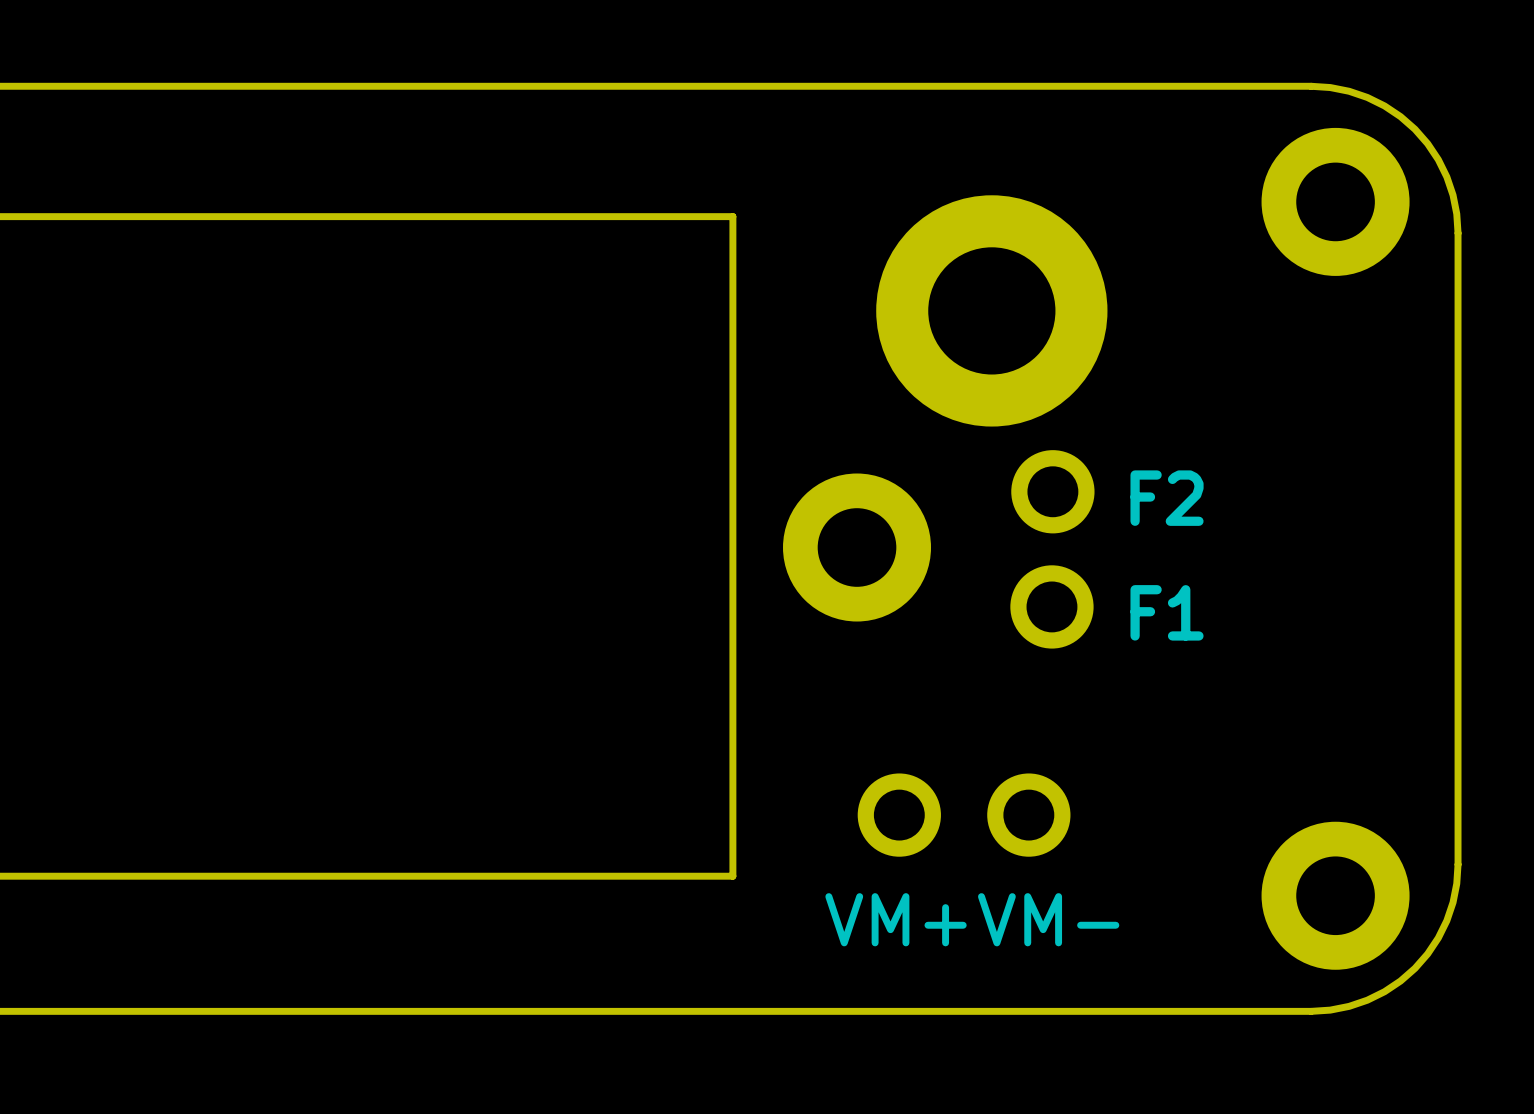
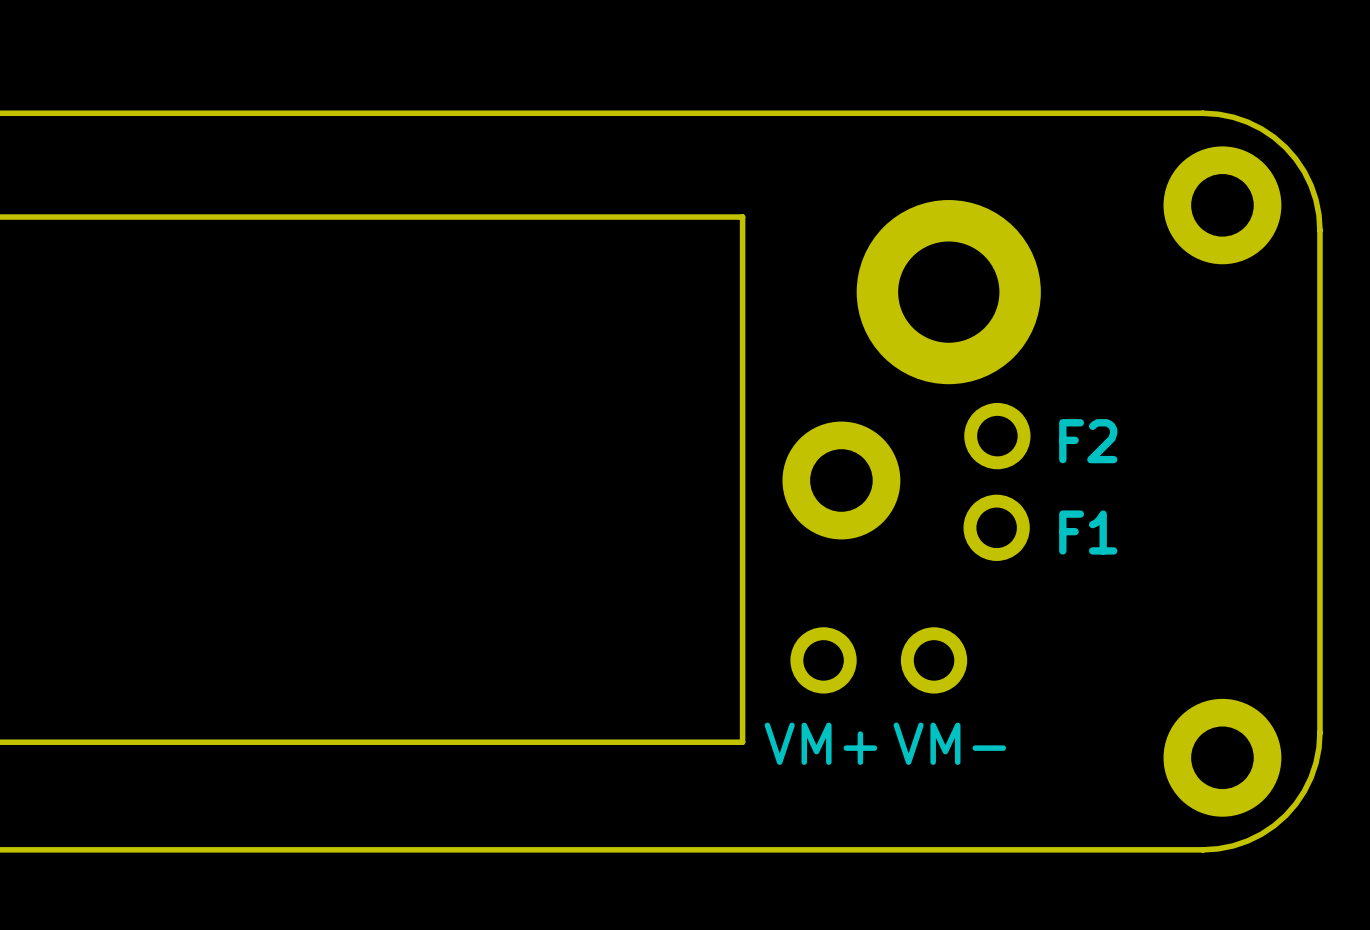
part position: (899, 815) -> (823, 660)
part position: (1028, 815) -> (934, 660)

